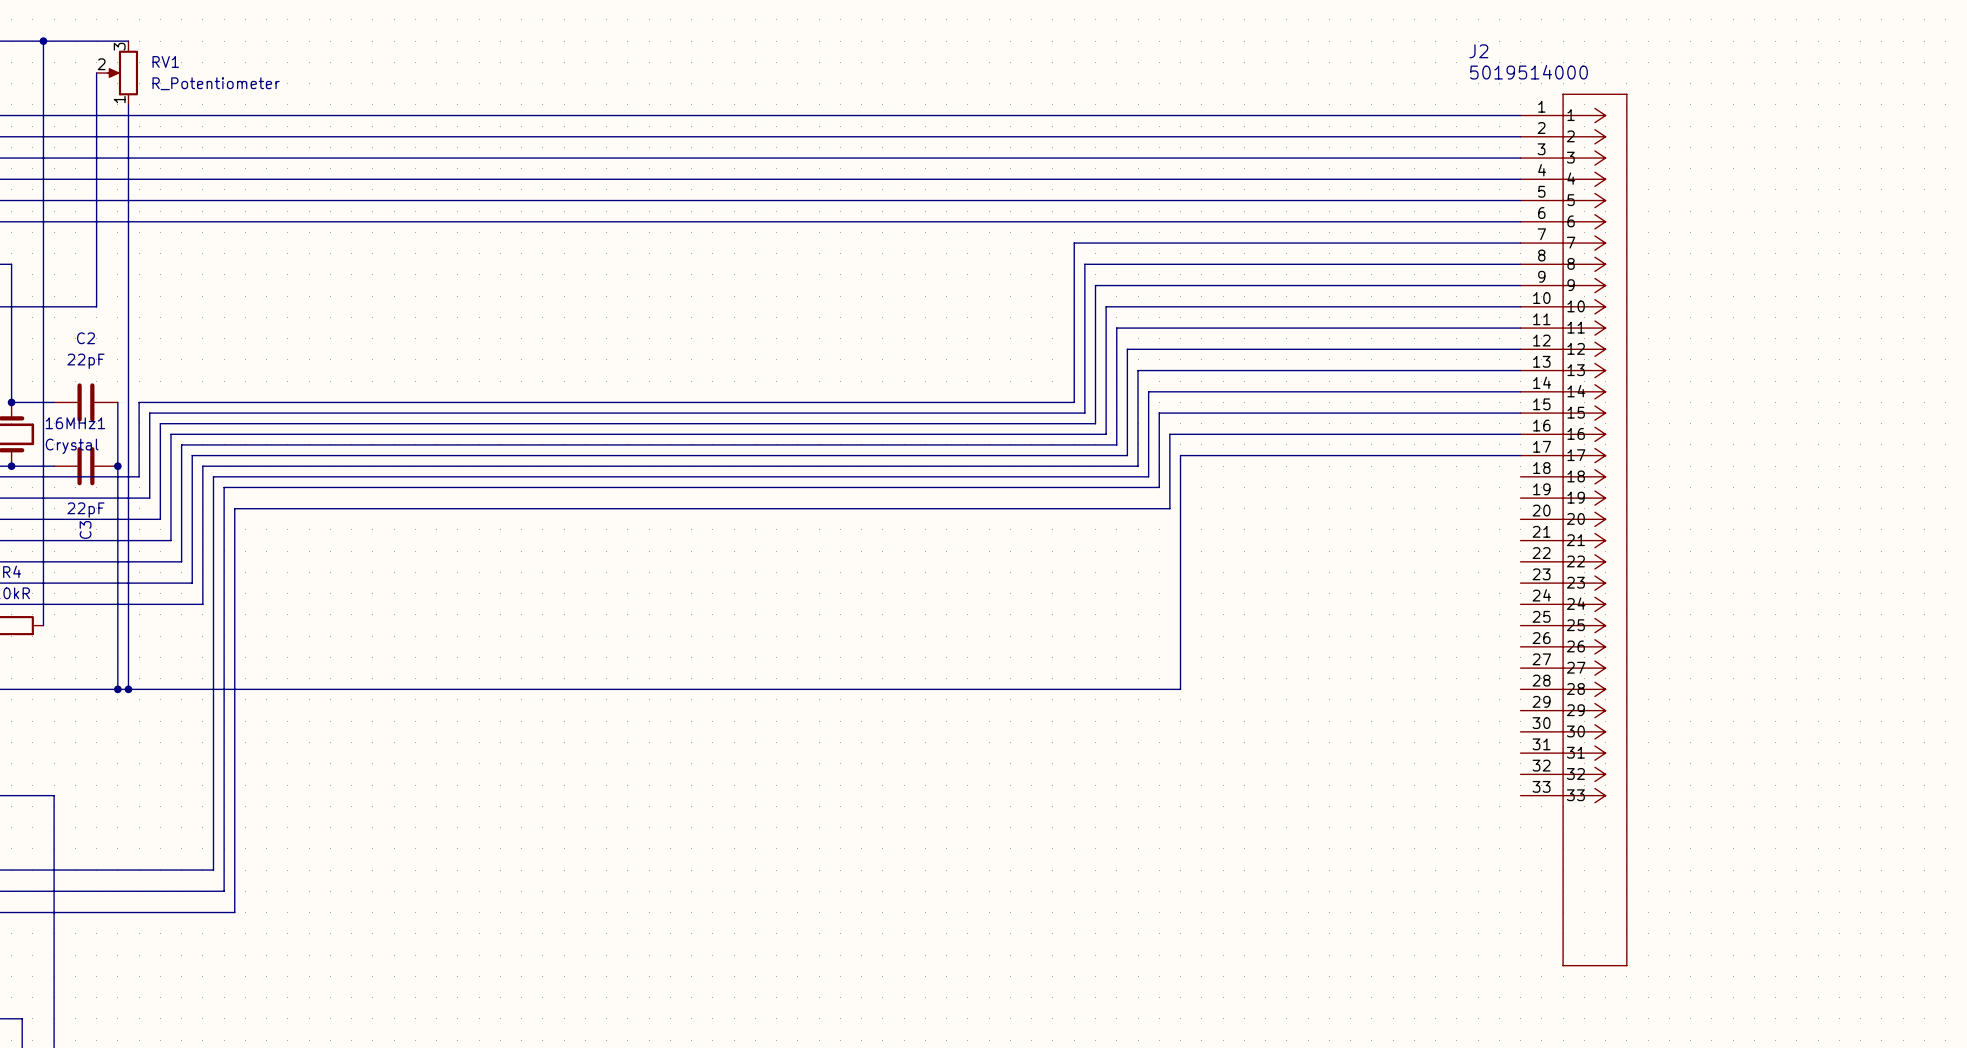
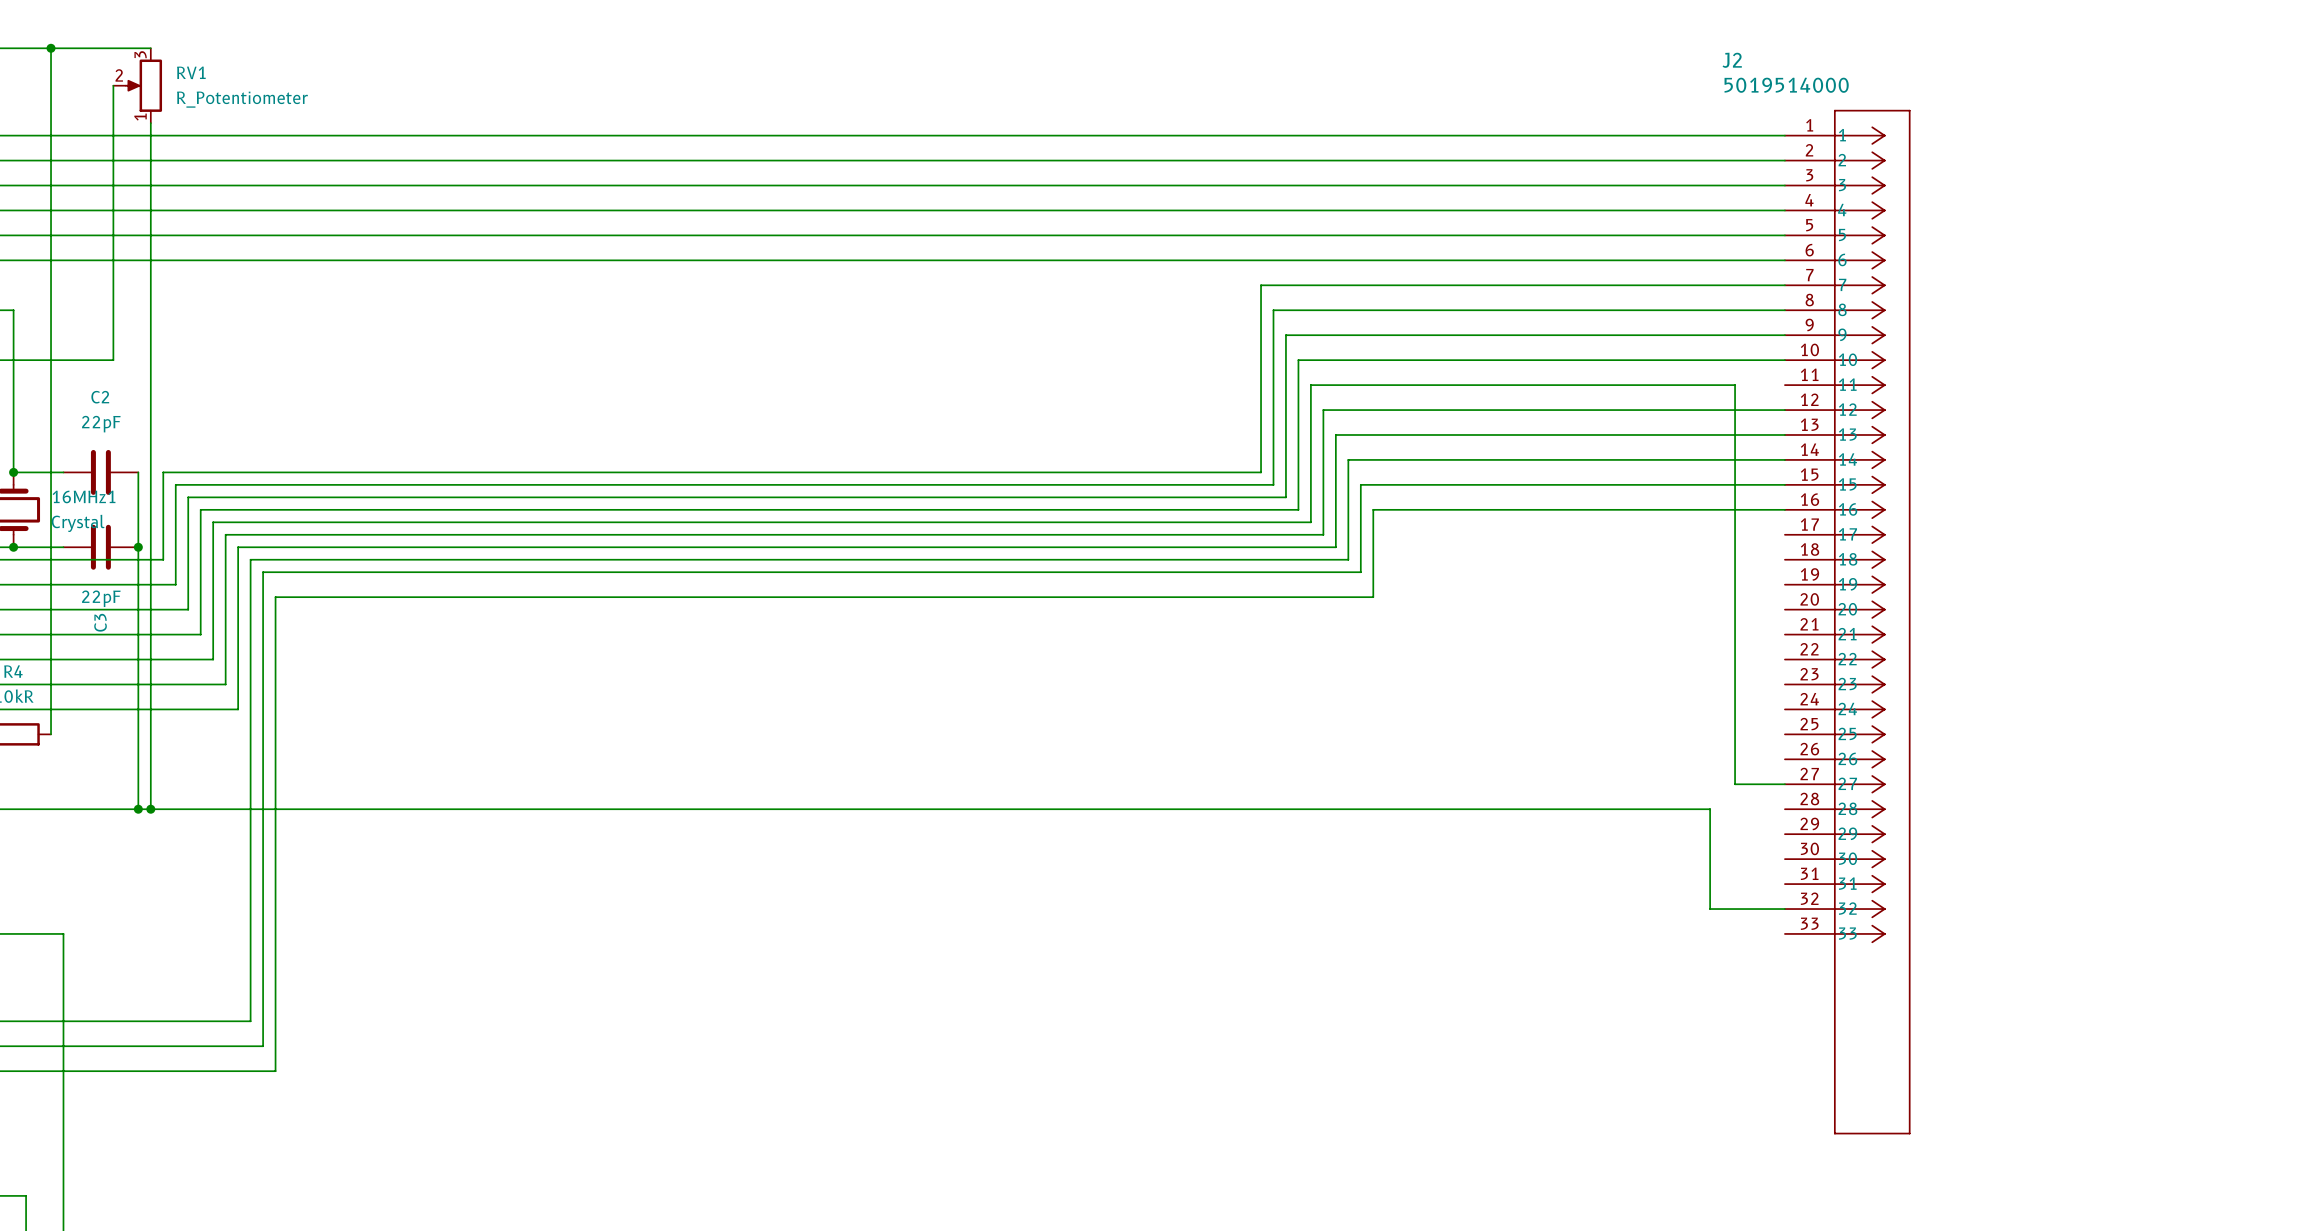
wire: (1478, 328) (1520, 328) -> (1735, 385) (1735, 784) (1784, 784)
wire: (1520, 455) (1180, 455) (1180, 689) -> (1784, 909) (1710, 909) (1710, 809) (1385, 809)

